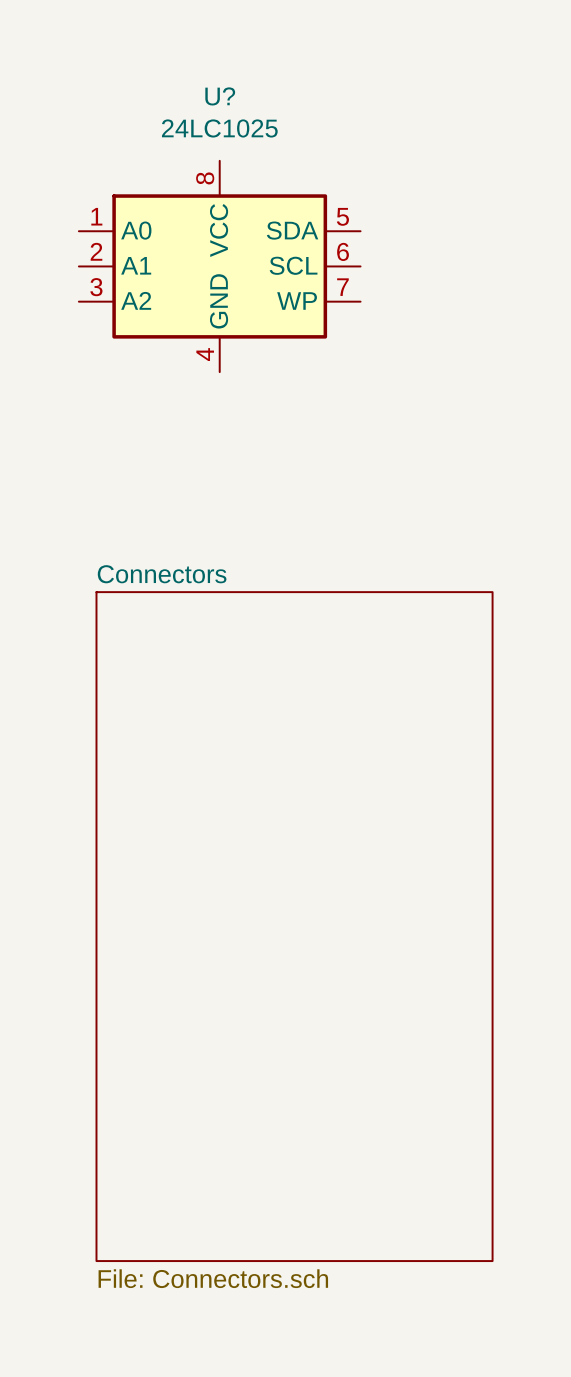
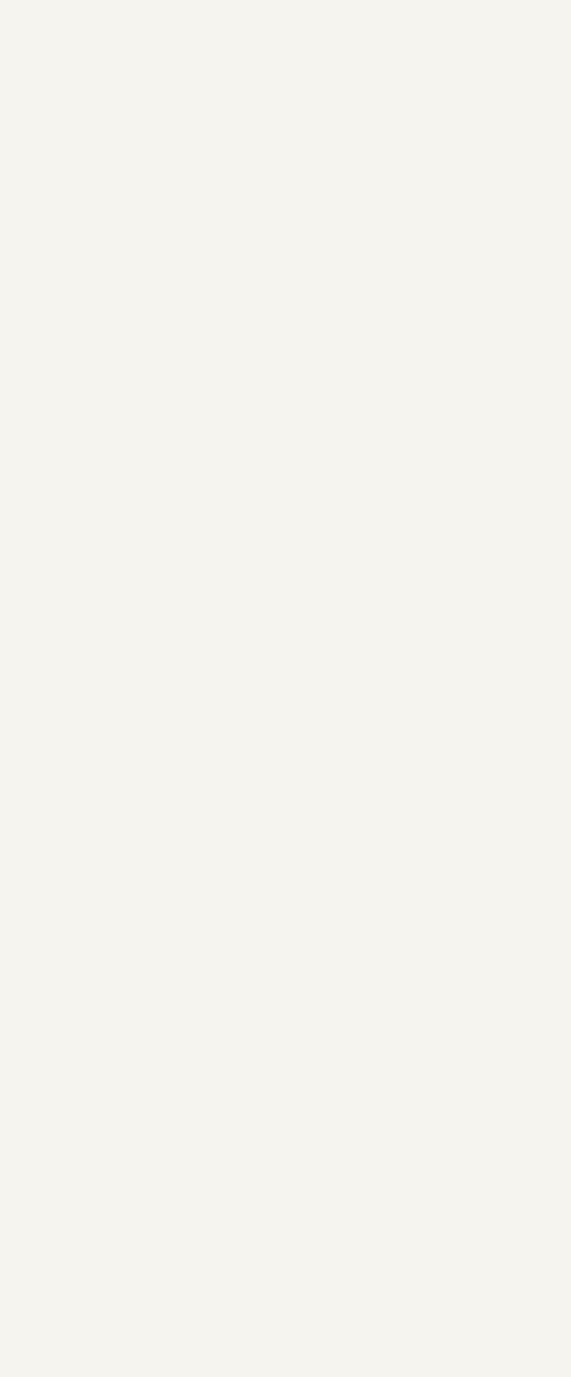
U?: 24LC1025 (219, 266) -> none
sheet Connectors: File: Connectors.sch (294, 926) -> none

